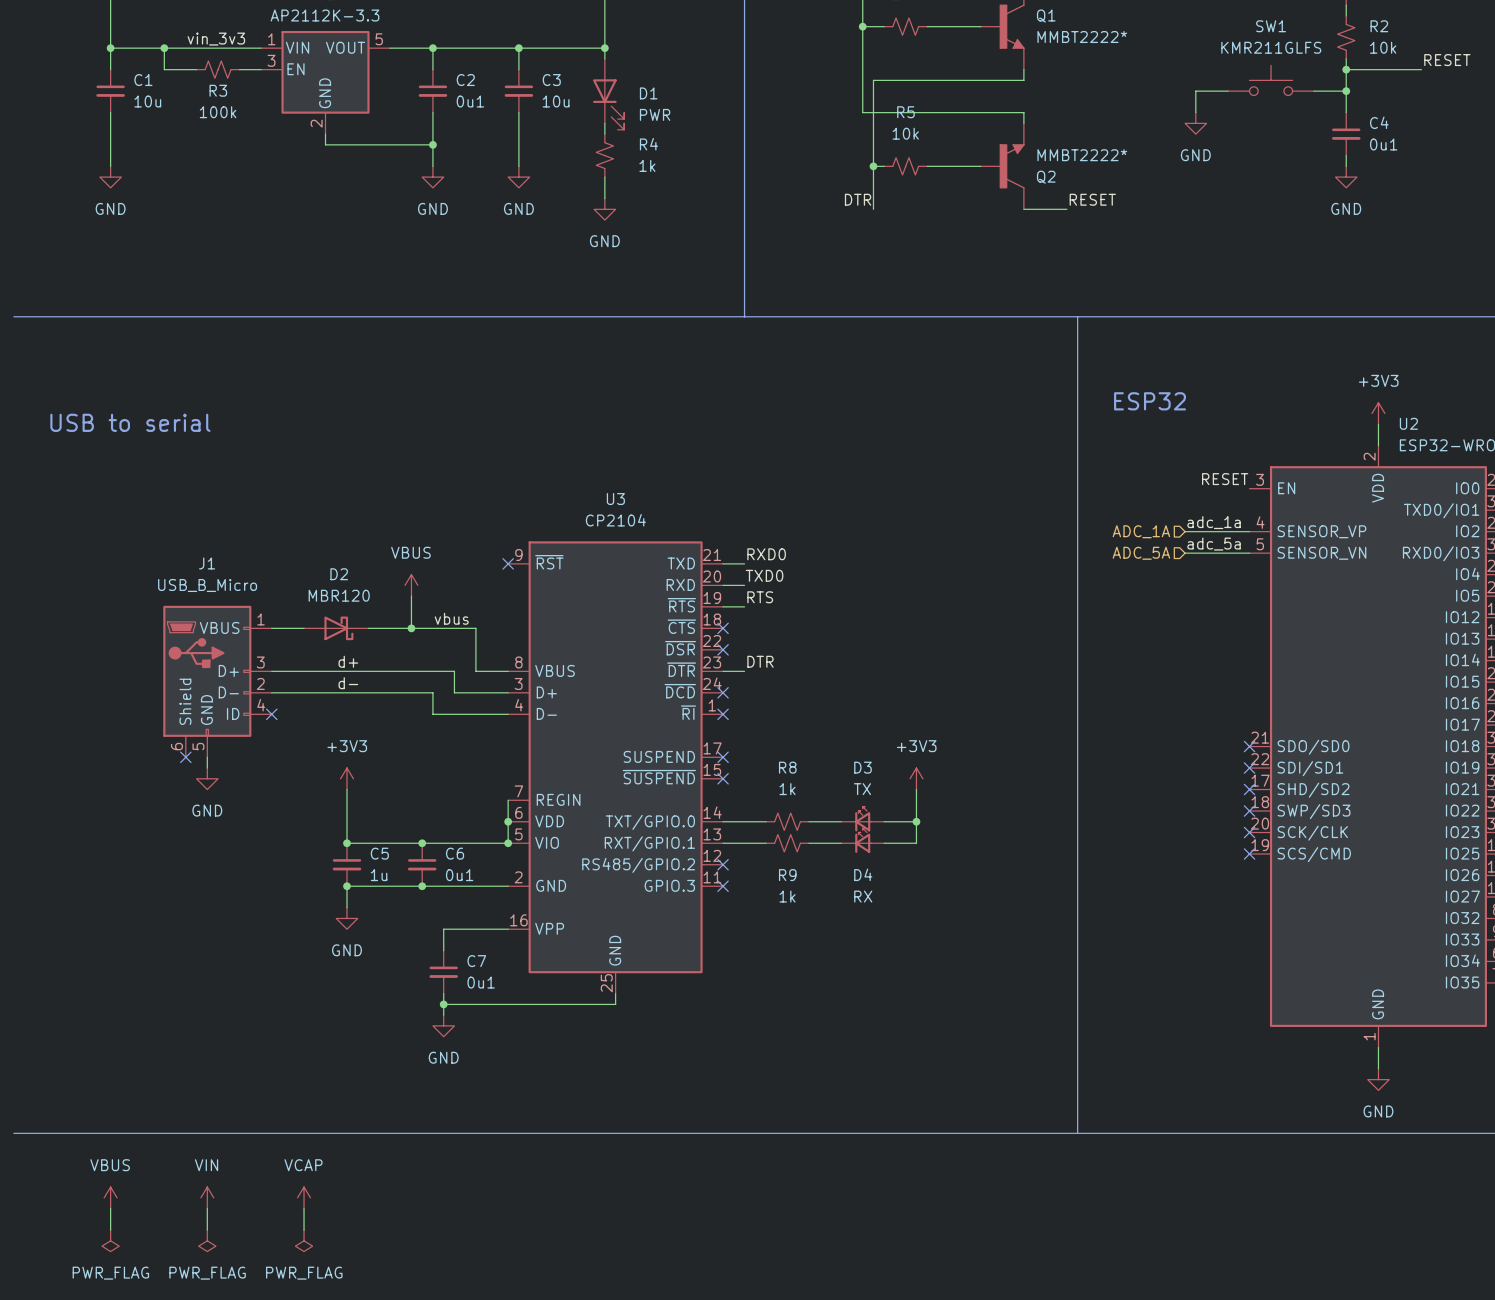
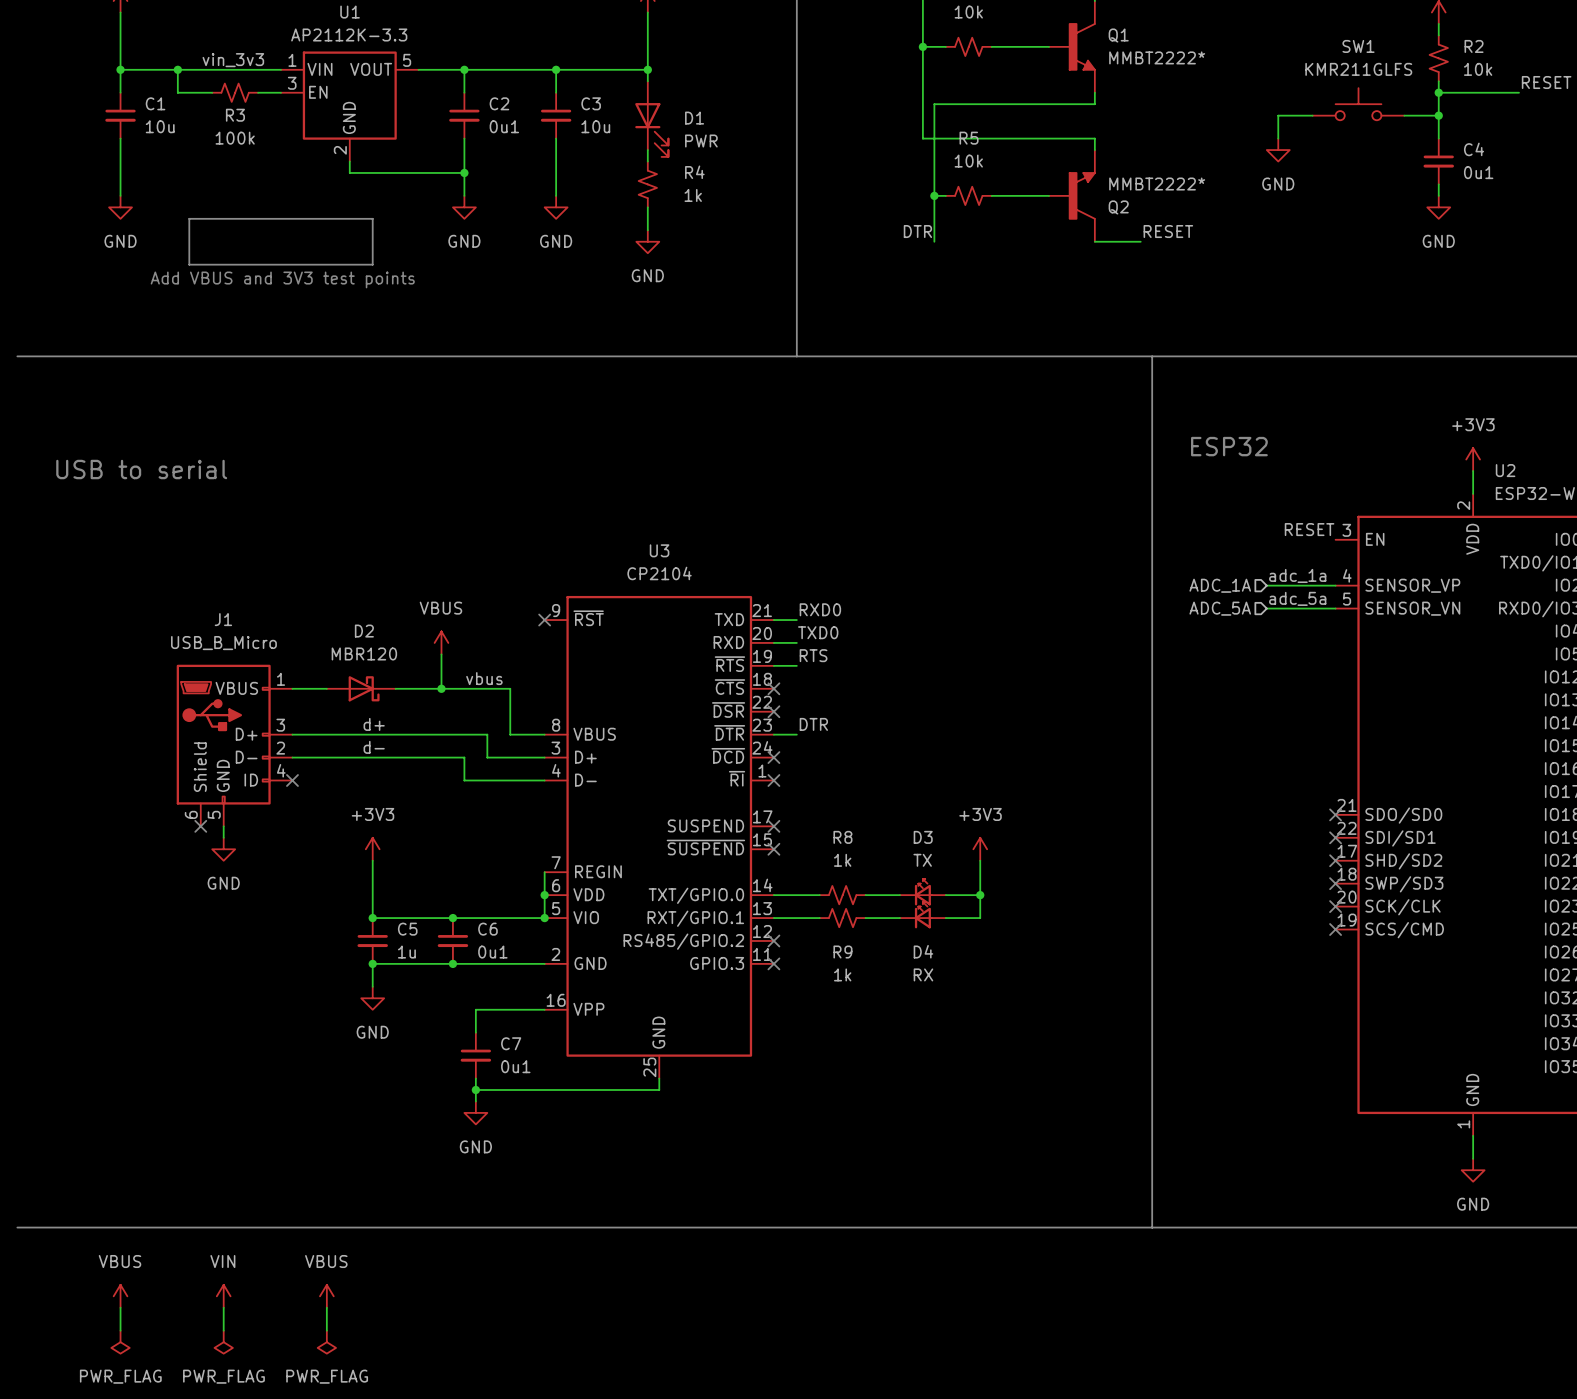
line: none -> (189, 218) (372, 218) (372, 264) (189, 264) (189, 218)
text: none -> Add VBUS and 3V3 test points (282, 279)
power symbol: VCAP (304, 1197) -> VBUS (326, 1296)

